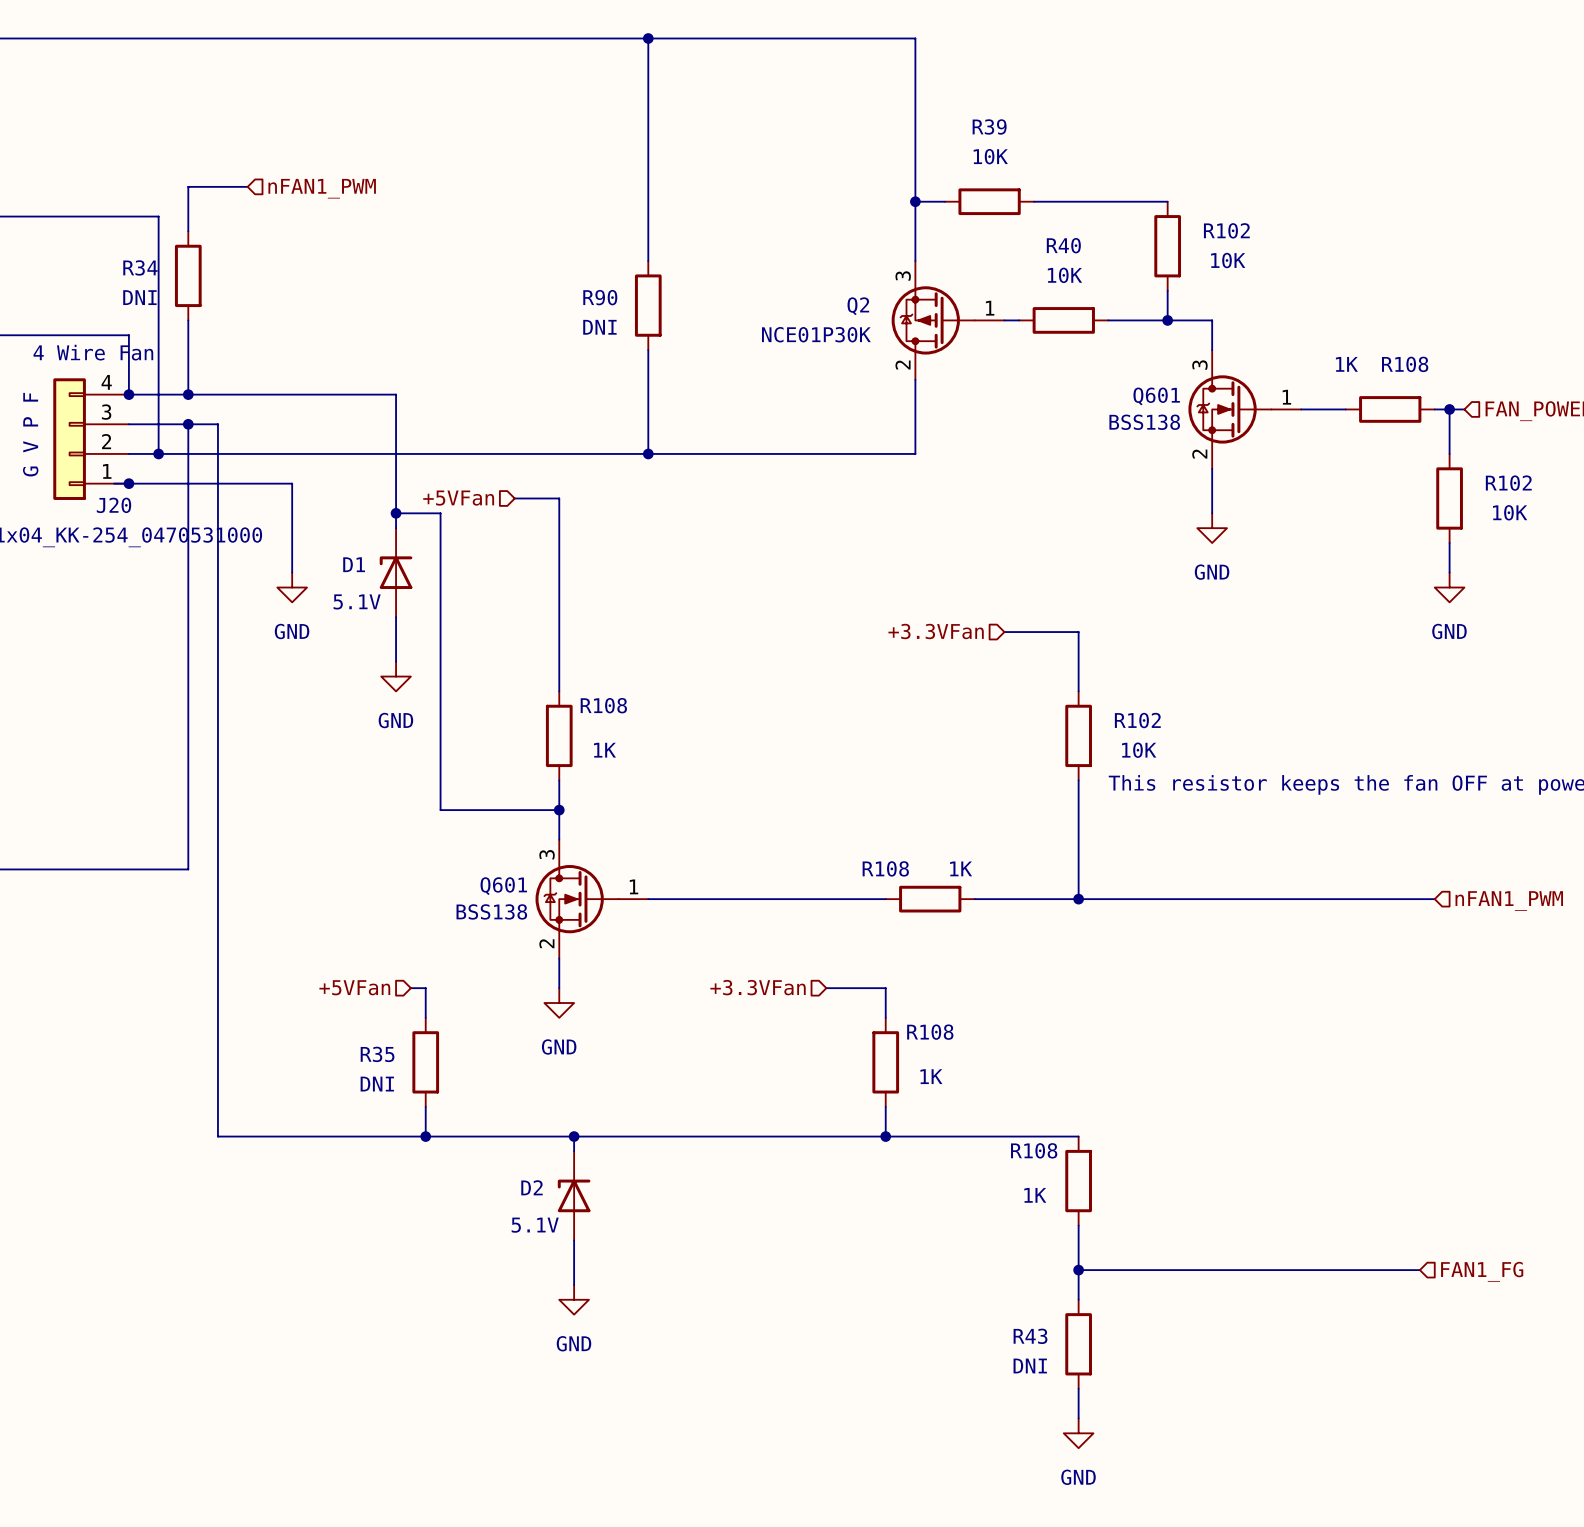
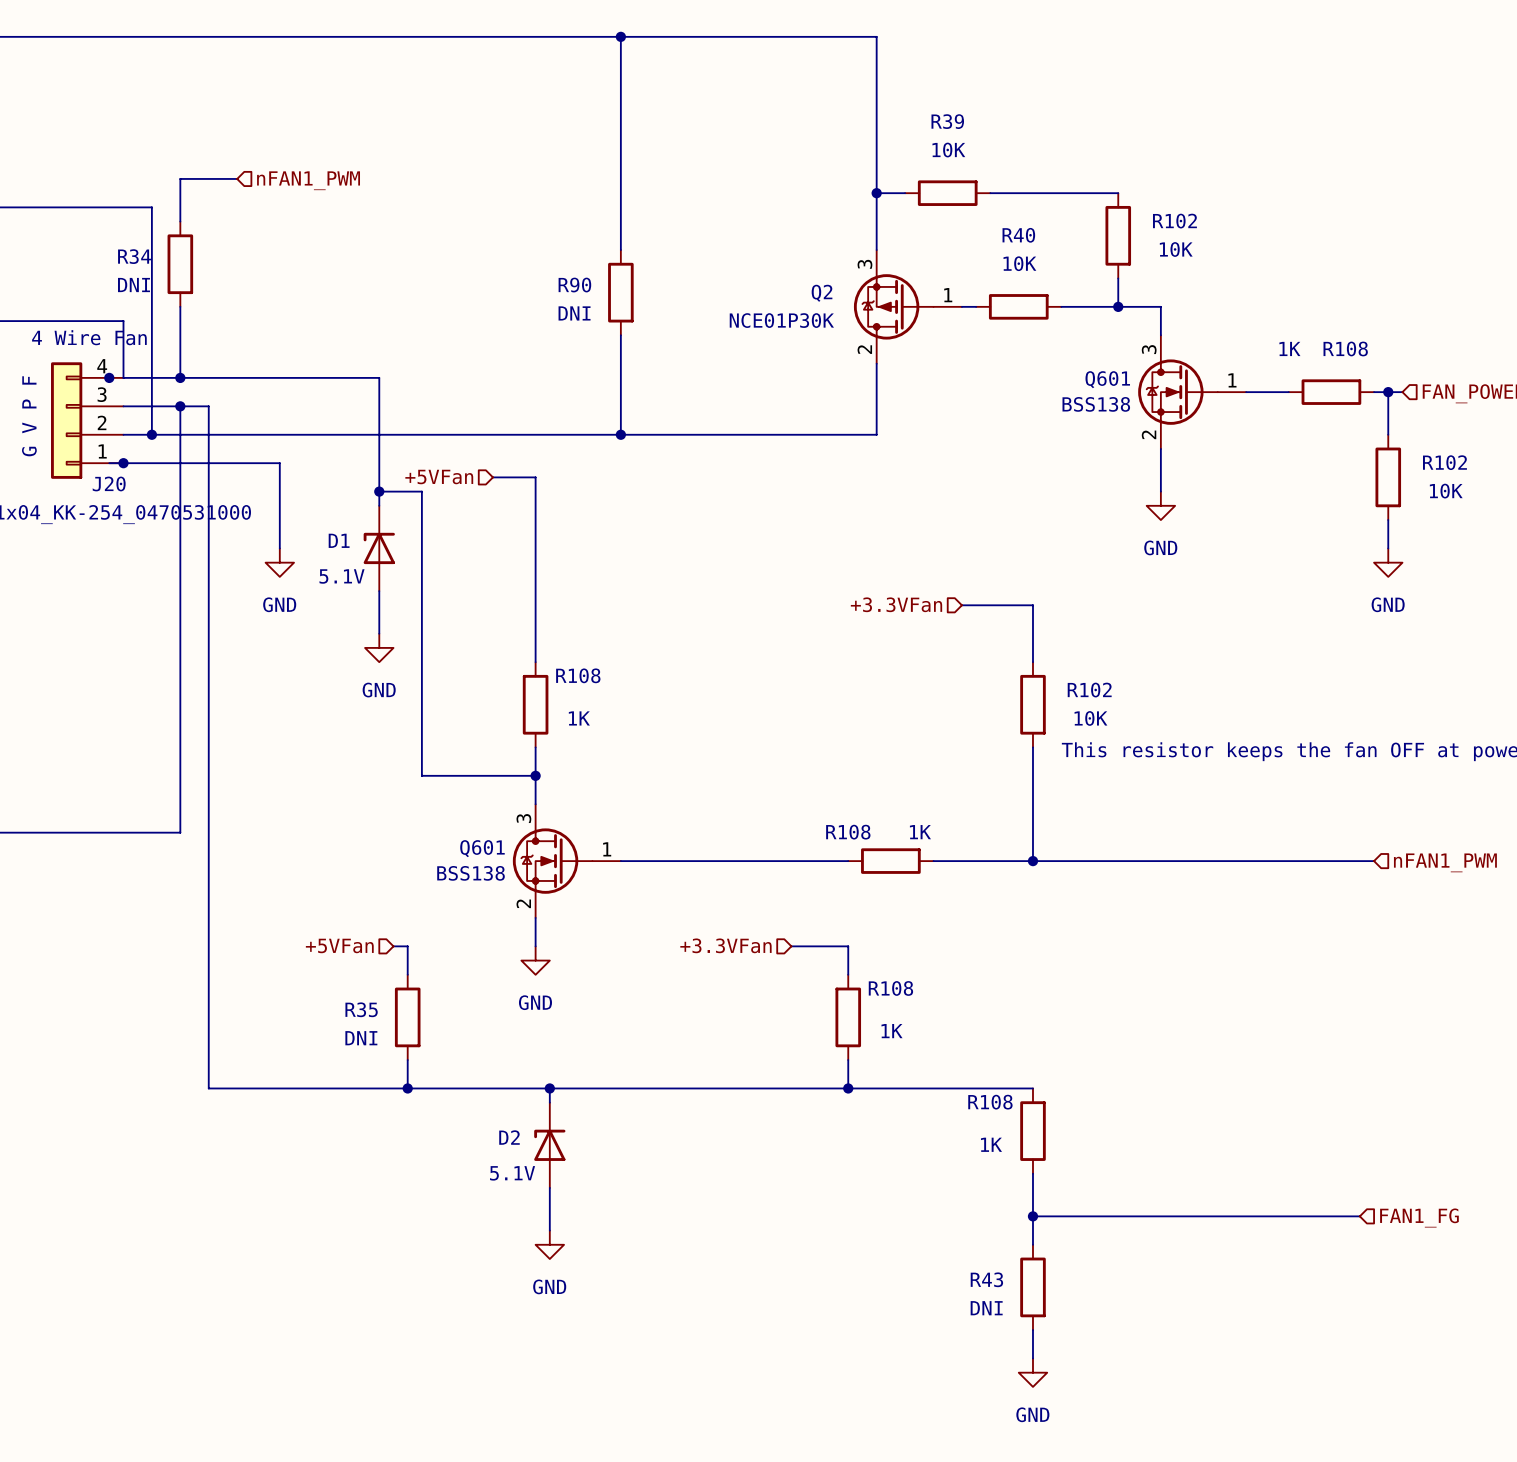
junction position: (128, 394) -> (109, 377)

